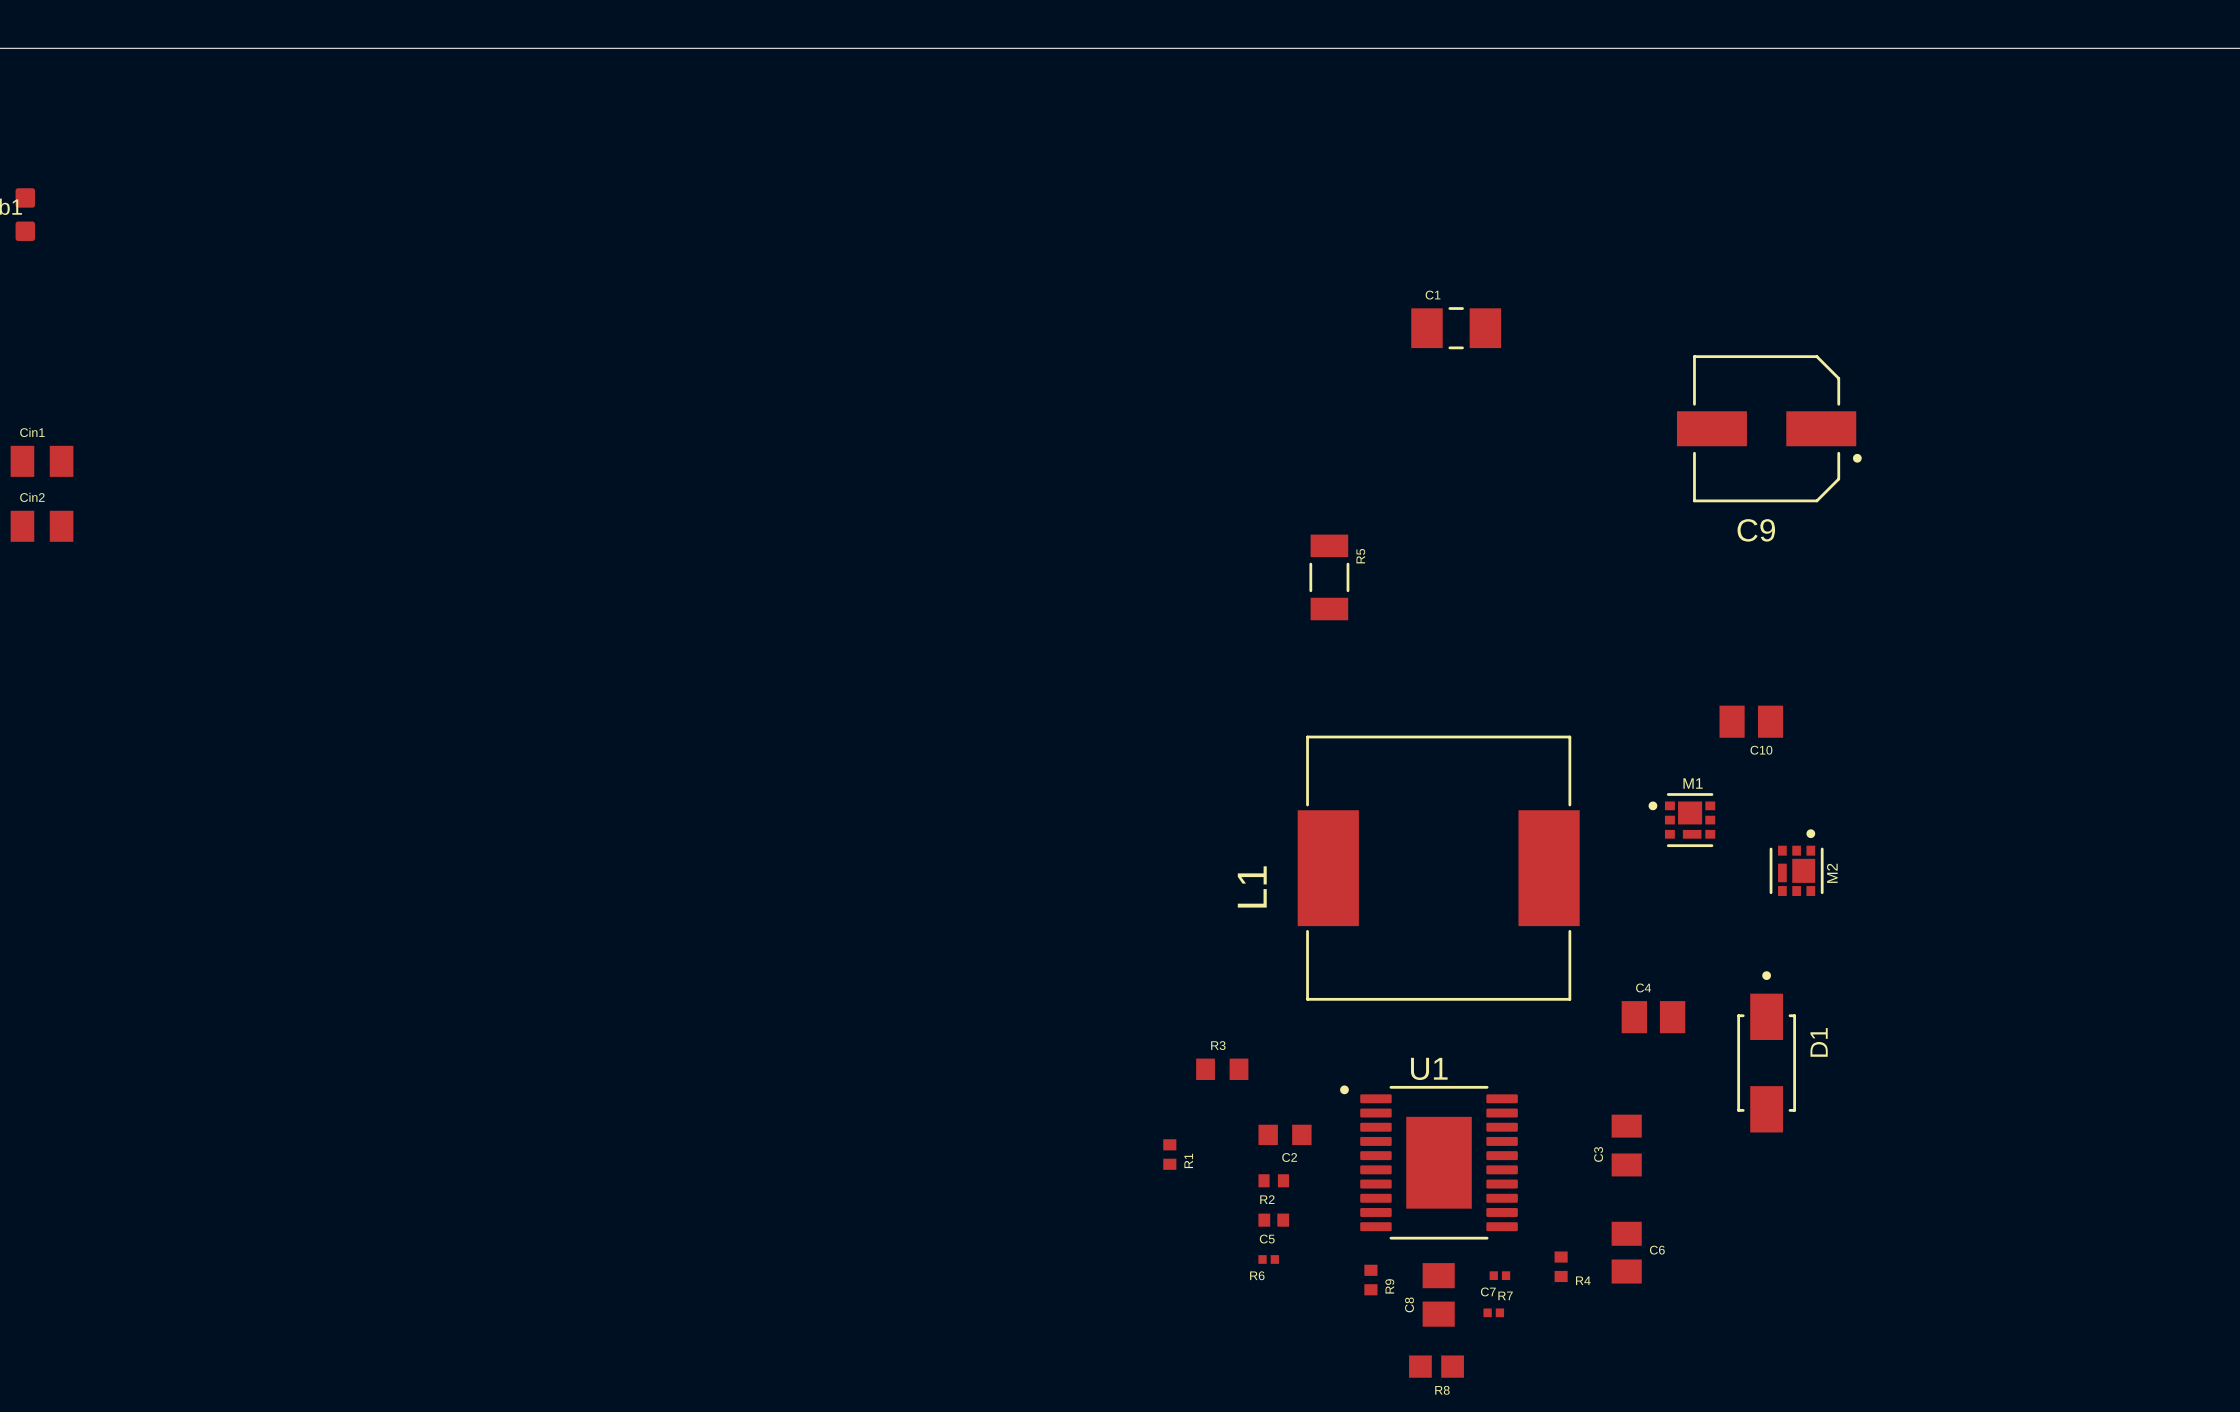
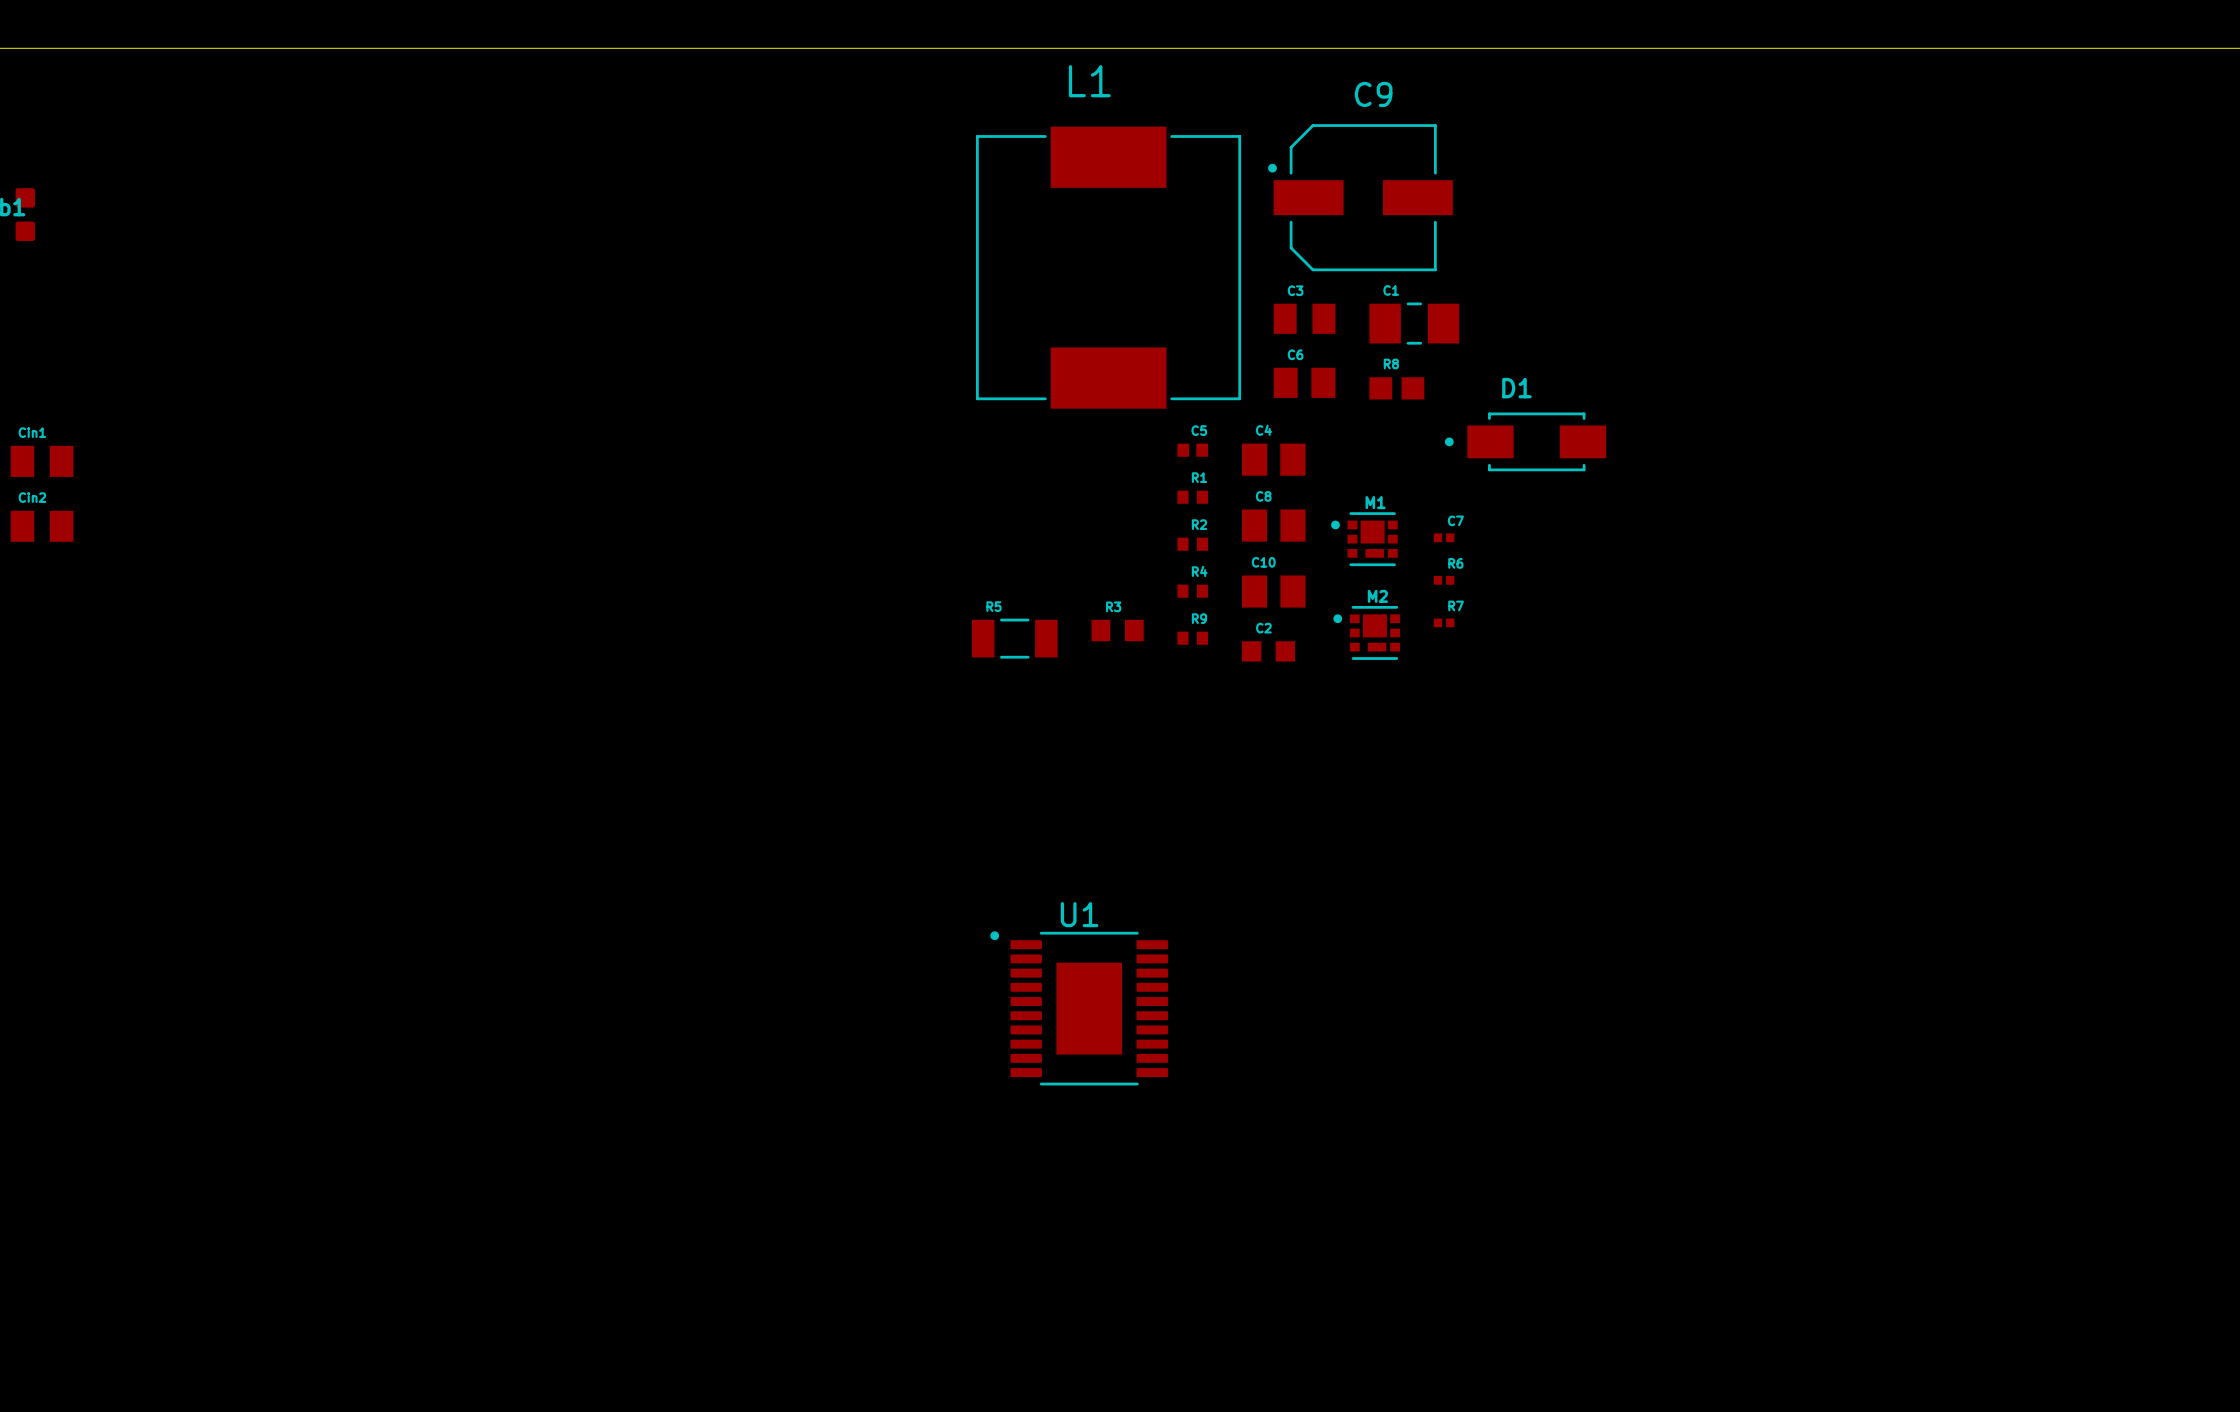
C1 position: (1456, 328) -> (1414, 323)
C9 rotation: 0° (1769, 428) -> 180° (1360, 197)
C9 position: (1769, 428) -> (1360, 197)
R5 name position: R5 (1360, 556) -> R5 (993, 606)
R5 rotation: 0° (1329, 577) -> 90° clockwise (1014, 638)
R5 position: (1329, 577) -> (1014, 638)
C10 position: (1751, 721) -> (1273, 591)
C10 name position: C10 (1761, 750) -> C10 (1263, 562)
M1 position: (1681, 820) -> (1364, 539)
M2 rotation: 0° (1796, 862) -> 90° counterclockwise (1366, 632)
M2 position: (1796, 862) -> (1366, 632)
L1 rotation: 0° (1438, 868) -> 90° clockwise (1108, 267)
L1 position: (1438, 868) -> (1108, 267)
C4 position: (1653, 1017) -> (1273, 459)
D1 rotation: 0° (1766, 1051) -> 90° counterclockwise (1525, 441)
D1 position: (1766, 1051) -> (1525, 441)
R3 position: (1222, 1069) -> (1117, 630)
C2 position: (1285, 1134) -> (1268, 651)
C3 rotation: 0° (1626, 1145) -> 90° clockwise (1304, 318)
C3 position: (1626, 1145) -> (1304, 318)
R1 rotation: 0° (1169, 1154) -> 90° clockwise (1192, 497)
R1 position: (1169, 1154) -> (1192, 497)
C2 name position: C2 (1289, 1157) -> C2 (1263, 628)
U1 position: (1428, 1162) -> (1079, 1008)
R2 position: (1273, 1180) -> (1192, 544)
R2 name position: R2 (1267, 1199) -> R2 (1199, 524)
C5 position: (1273, 1220) -> (1192, 450)
C5 name position: C5 (1267, 1239) -> C5 (1199, 430)
C6 name position: C6 (1657, 1250) -> C6 (1295, 354)
C6 rotation: 0° (1626, 1252) -> 90° clockwise (1304, 382)
C6 position: (1626, 1252) -> (1304, 382)
R6 position: (1268, 1259) -> (1444, 580)
R4 rotation: 0° (1561, 1266) -> 90° clockwise (1192, 591)
R4 position: (1561, 1266) -> (1192, 591)
R6 name position: R6 (1257, 1275) -> R6 (1455, 563)
C7 position: (1499, 1275) -> (1444, 537)
R9 rotation: 0° (1370, 1280) -> 90° clockwise (1192, 638)
R9 position: (1370, 1280) -> (1192, 638)
C7 name position: C7 (1488, 1291) -> C7 (1455, 520)
C8 rotation: 0° (1438, 1294) -> 90° clockwise (1273, 525)
C8 position: (1438, 1294) -> (1273, 525)
R7 position: (1493, 1312) -> (1444, 622)
R8 position: (1436, 1366) -> (1396, 388)
R8 name position: R8 (1442, 1390) -> R8 (1391, 363)

